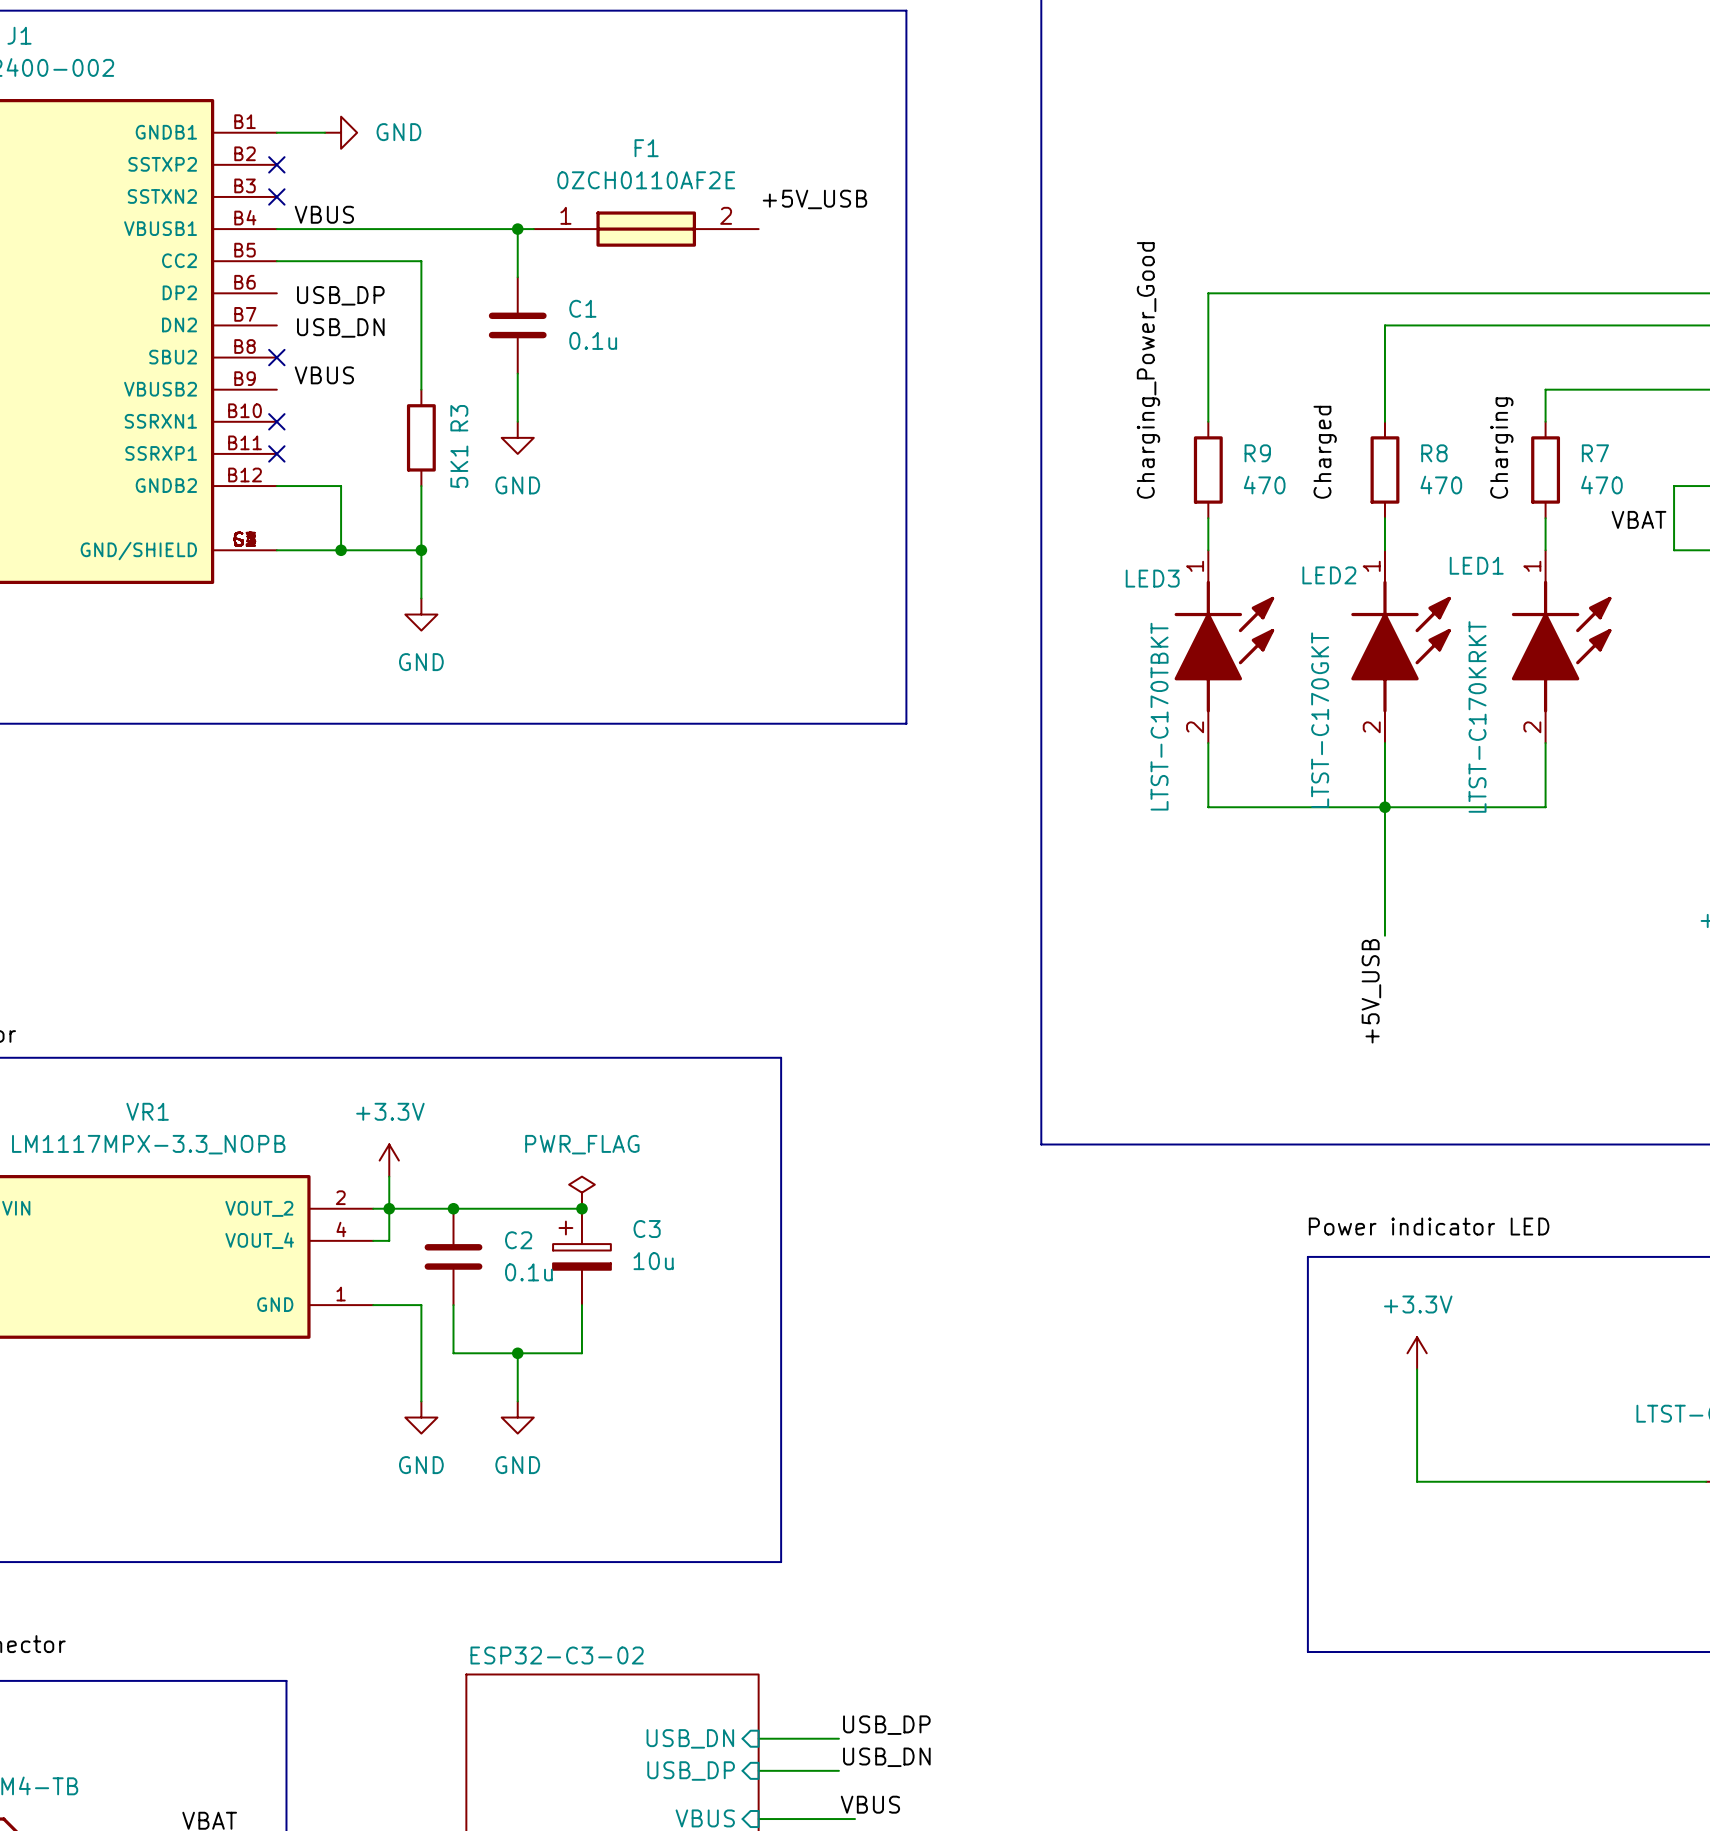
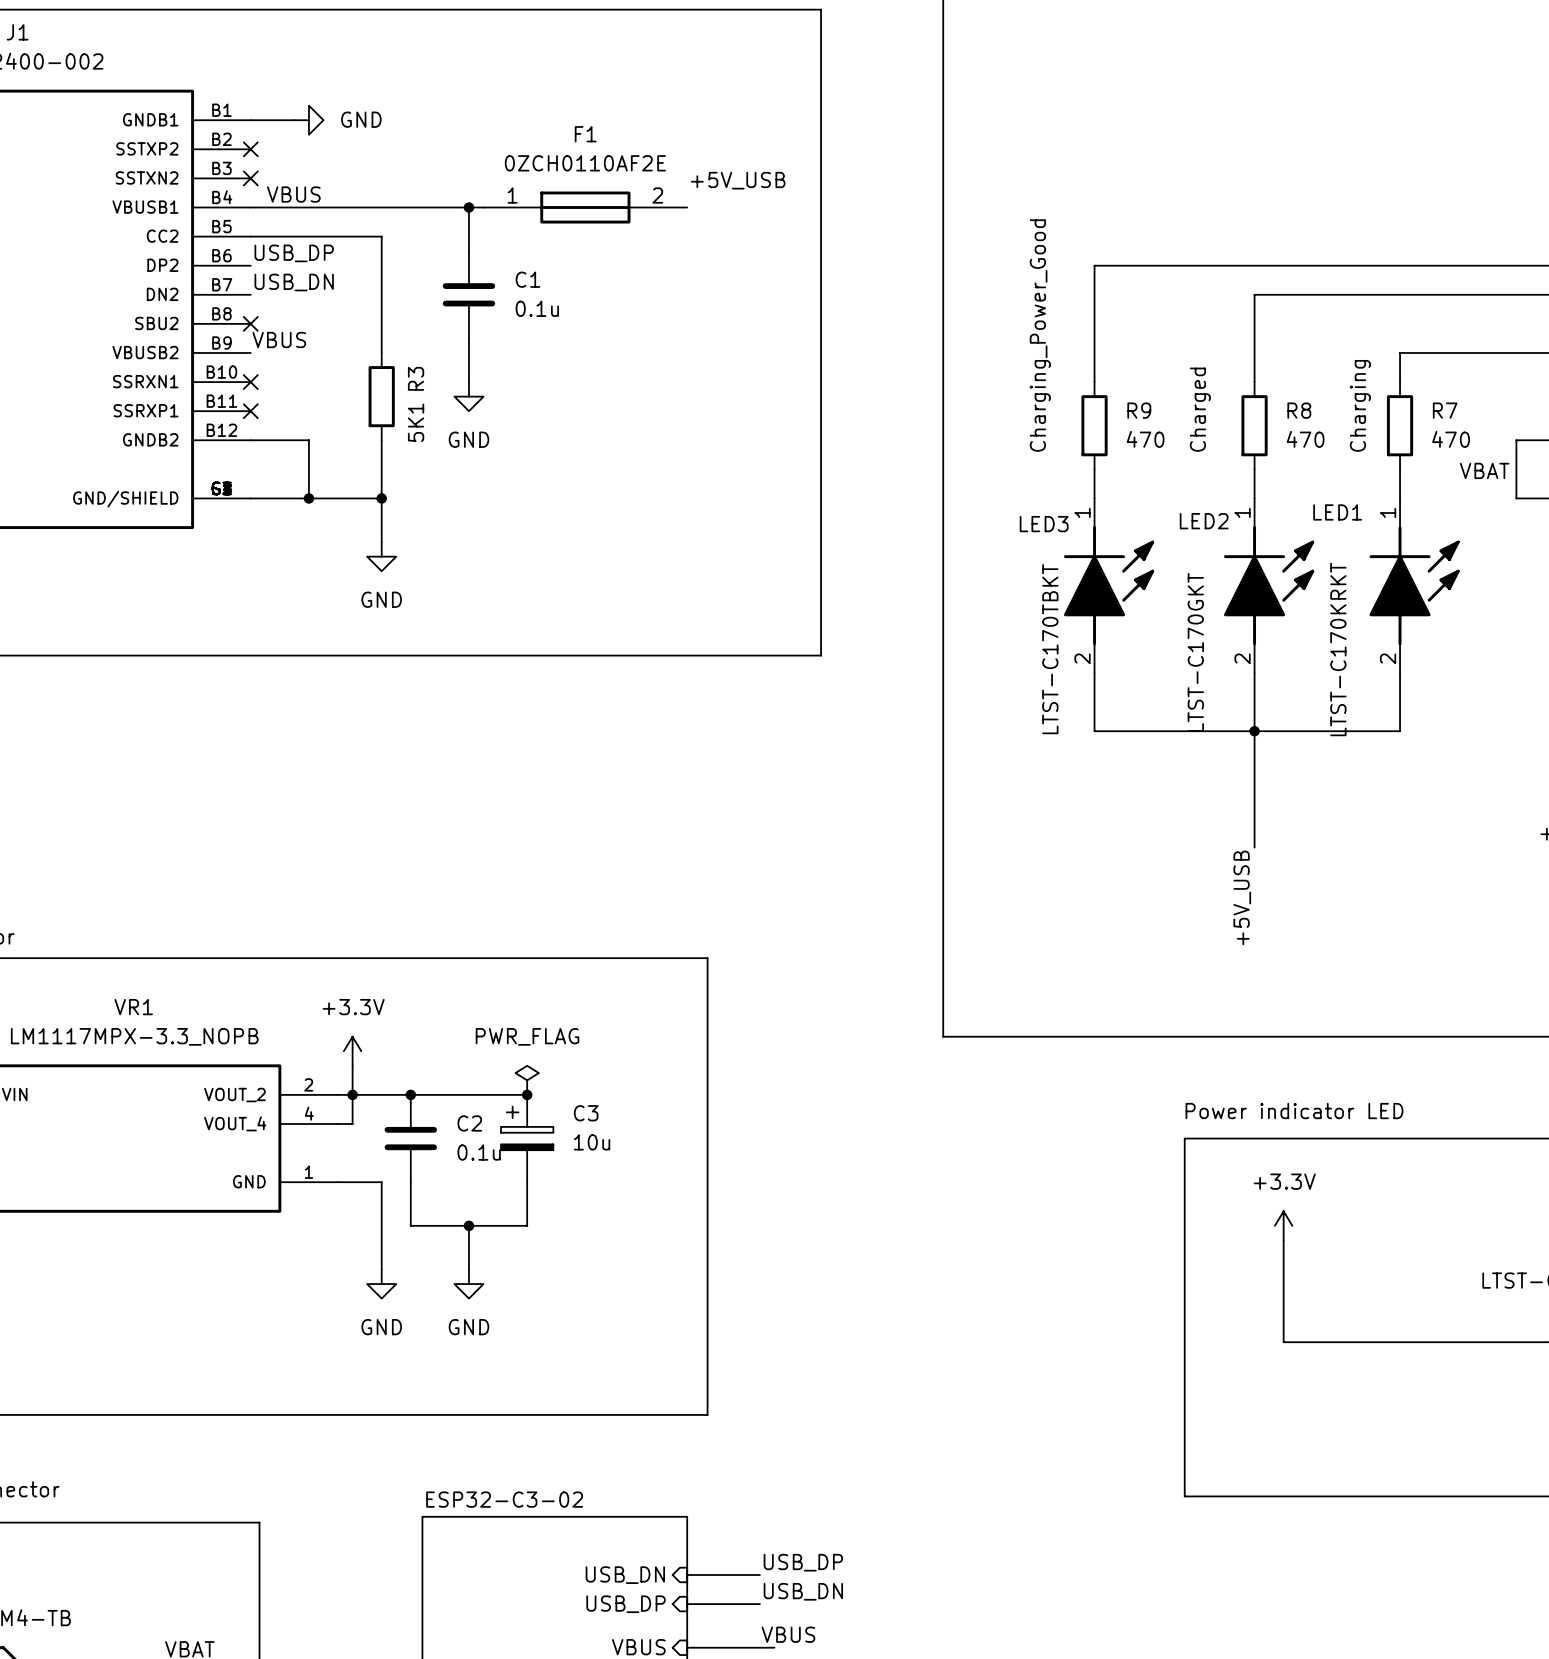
label position: USB_DP (340, 295) -> USB_DP (294, 253)
label position: USB_DN (340, 327) -> USB_DN (294, 282)
label position: VBUS (324, 375) -> VBUS (279, 340)

